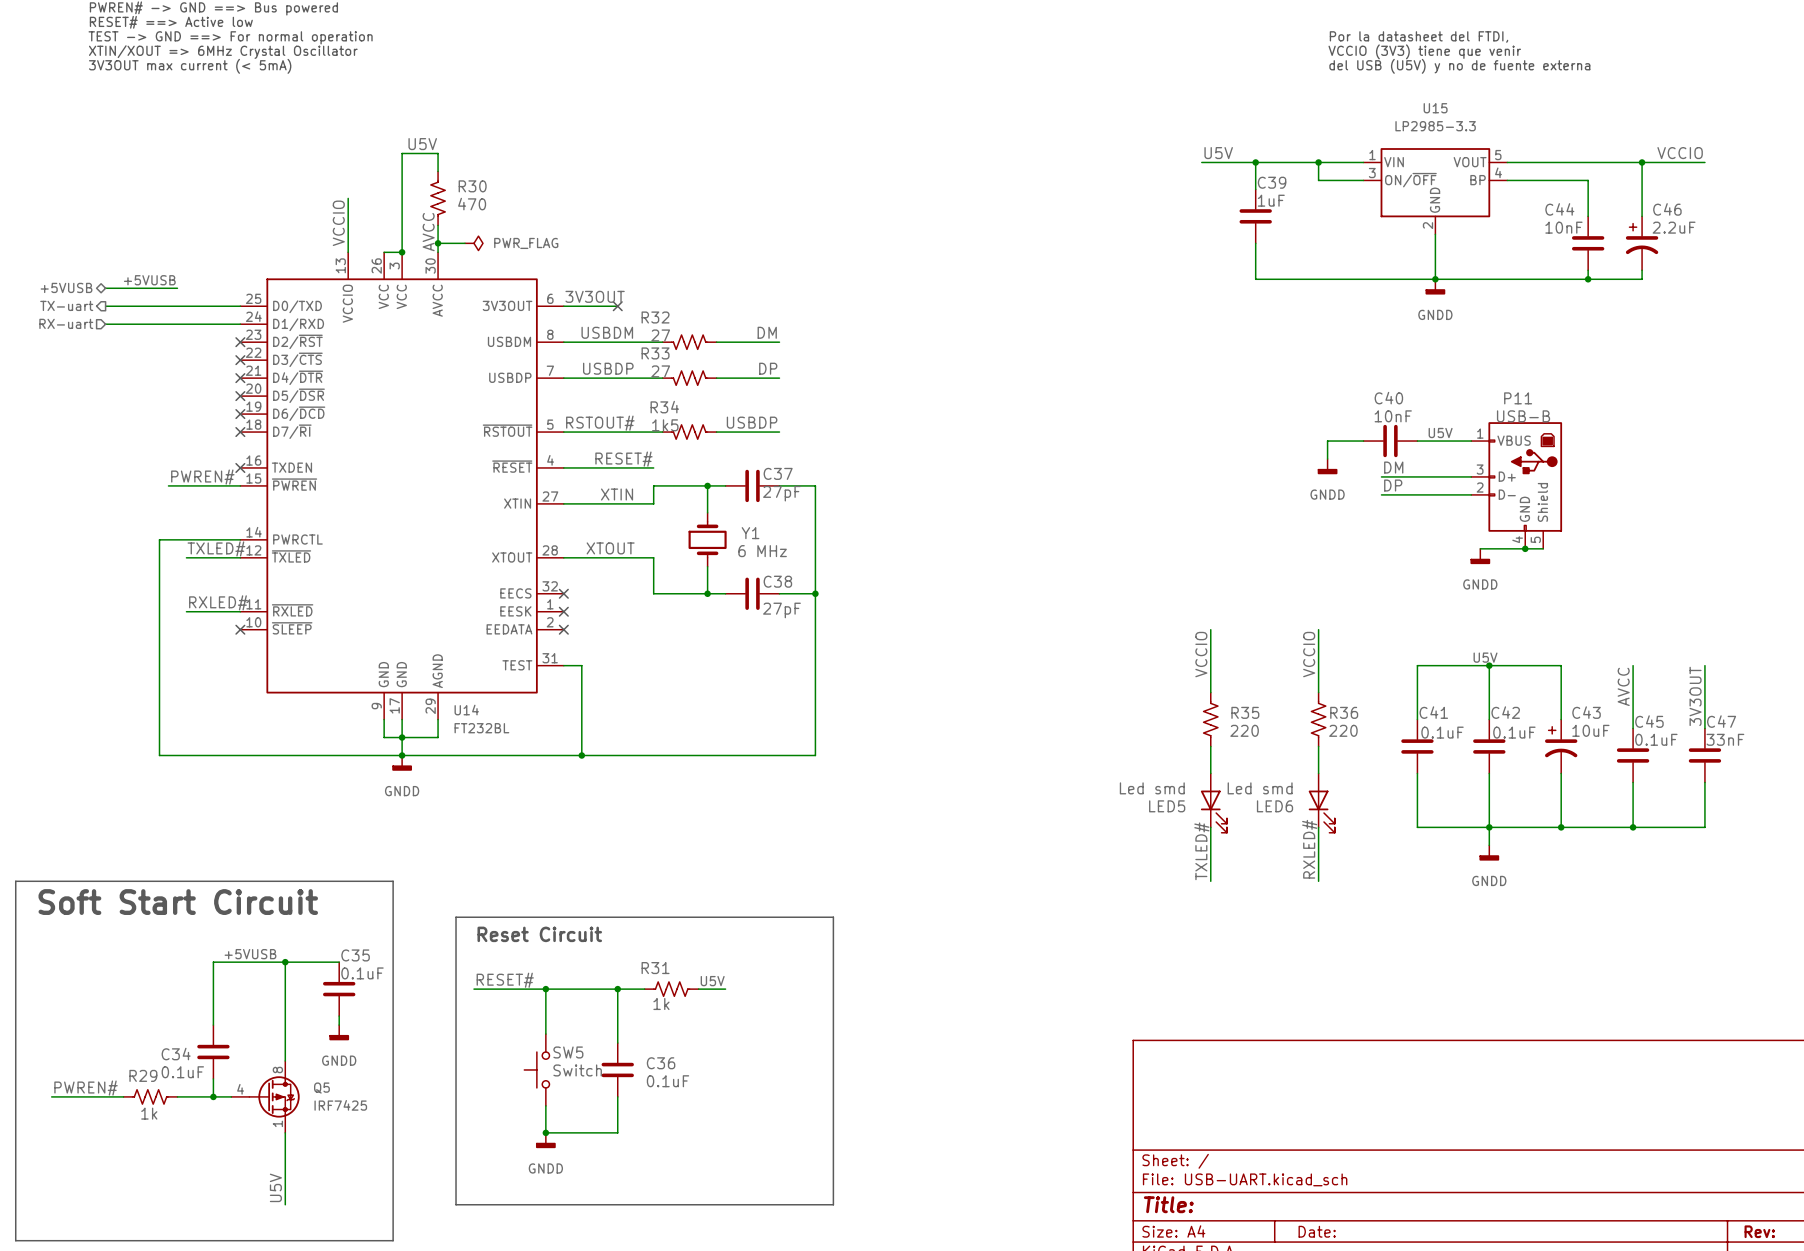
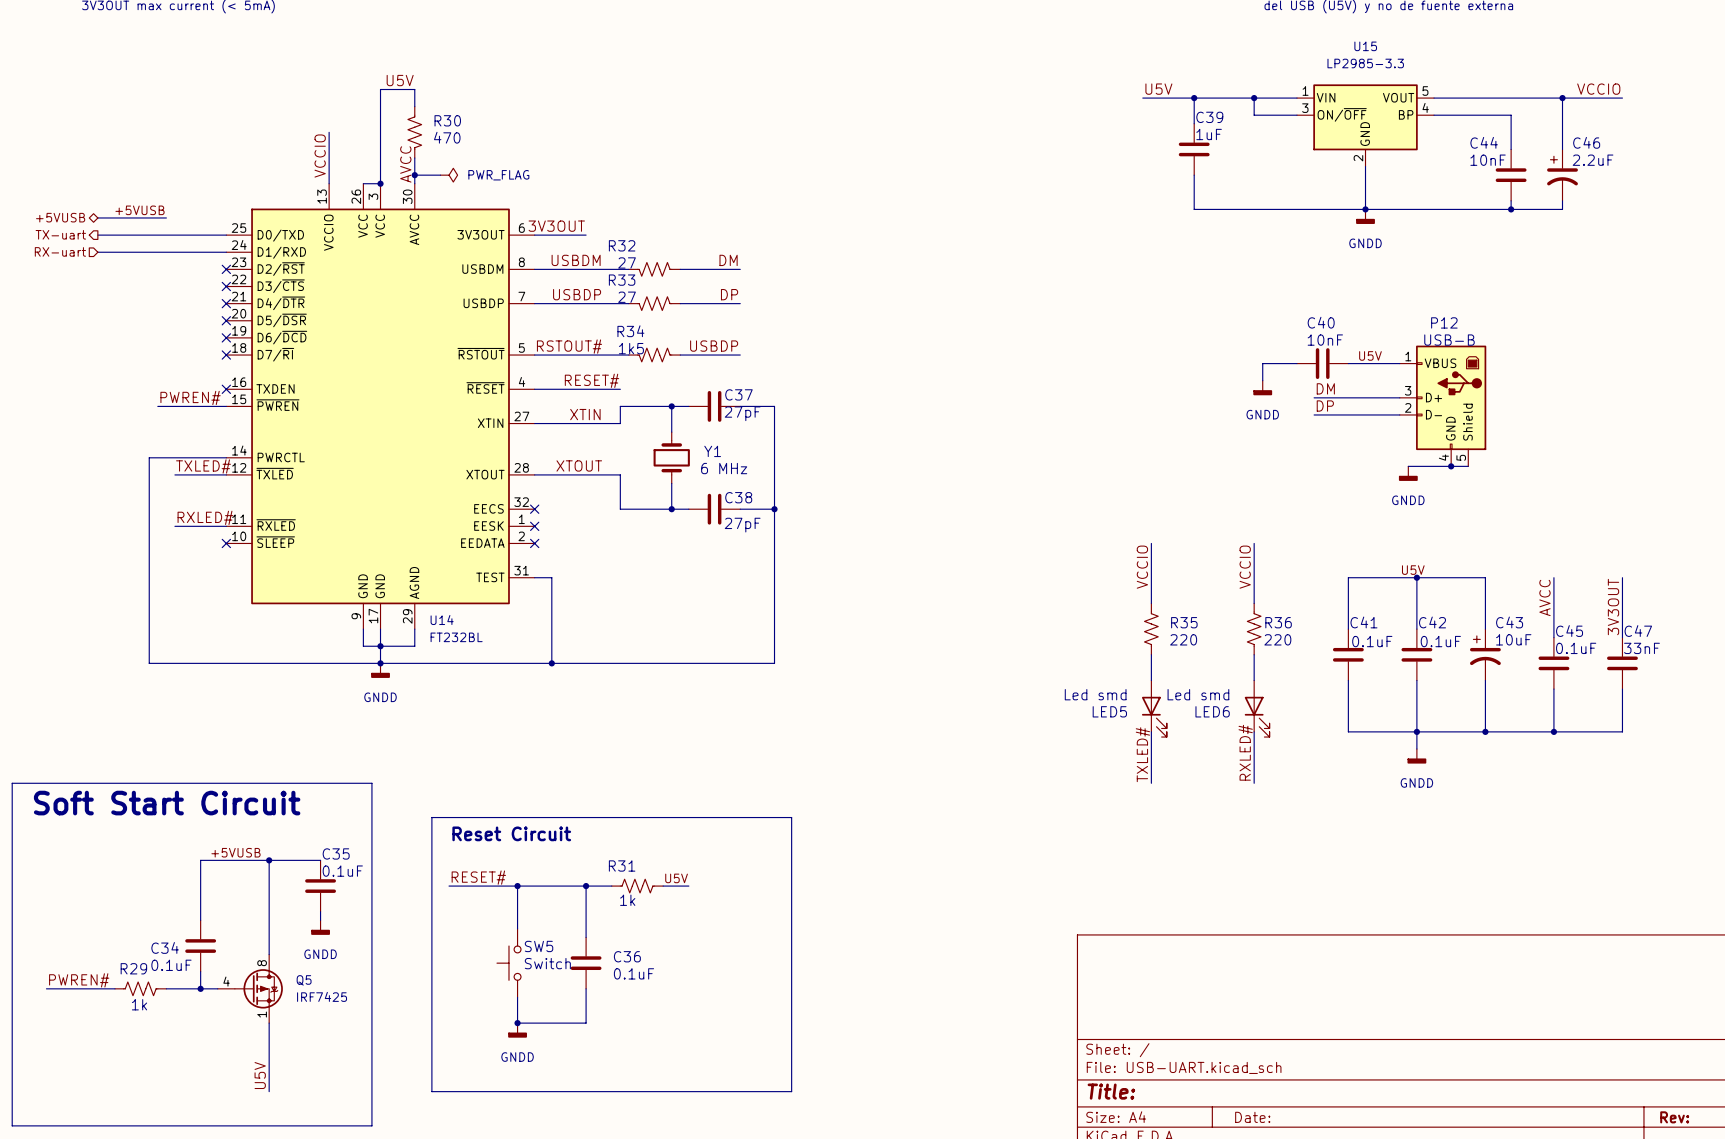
label position: 3V3OUT (595, 296) -> 3V3OUT (556, 226)
no-connect mark: (617, 306) -> none
P11 name: P11 (1518, 398) -> P12 (1444, 322)

